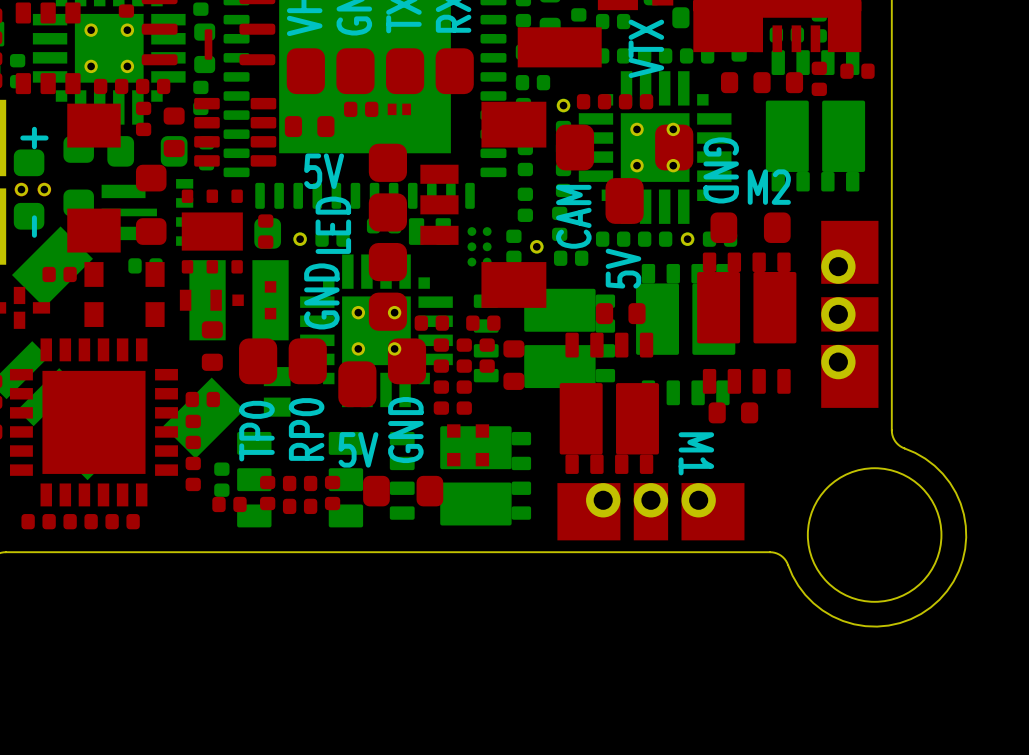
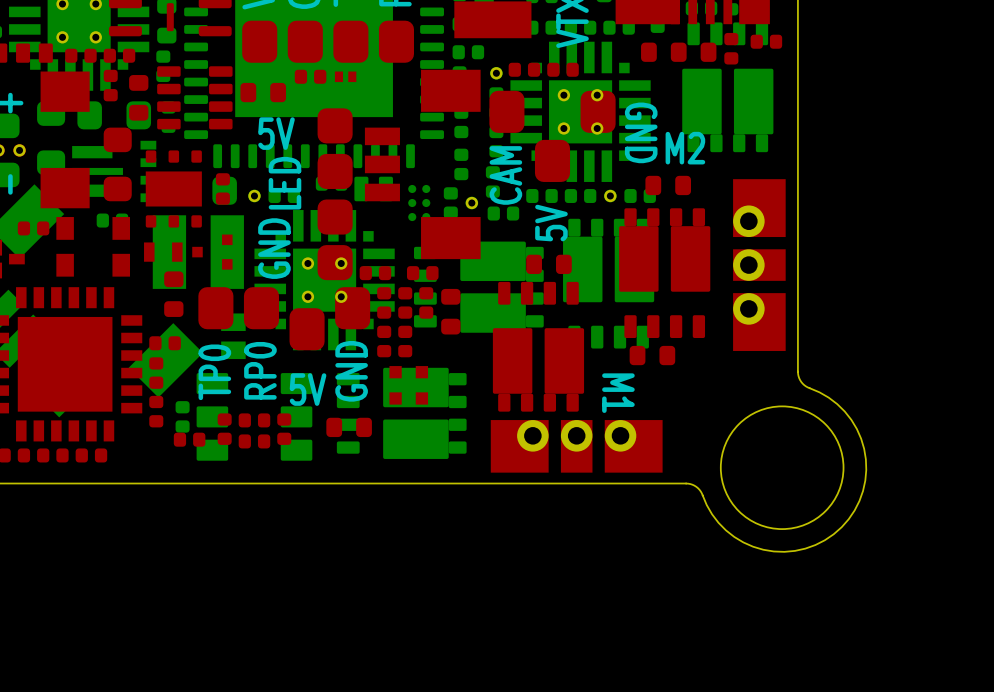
part footprint: [710, 212, 791, 243] -> [645, 175, 692, 196]
part footprint: [363, 475, 444, 507] -> [326, 417, 372, 438]

